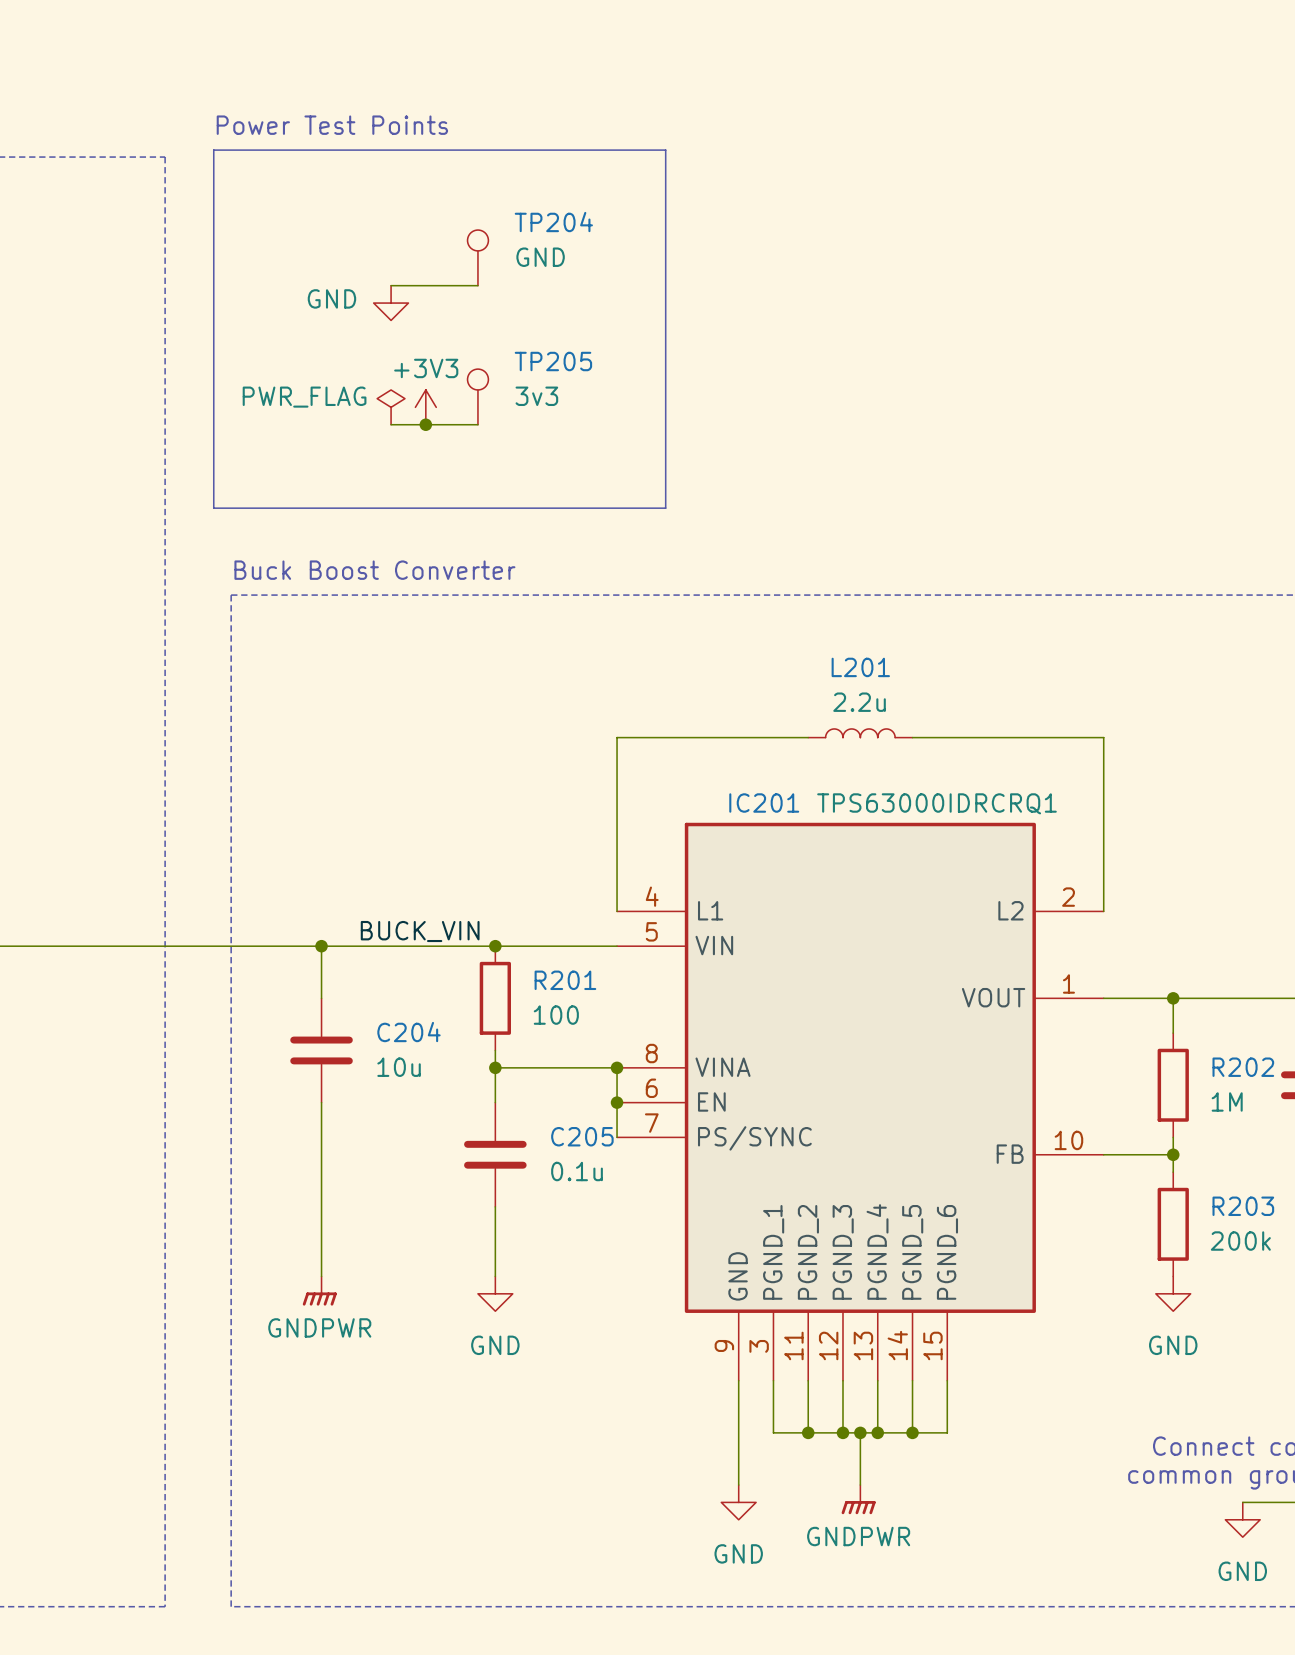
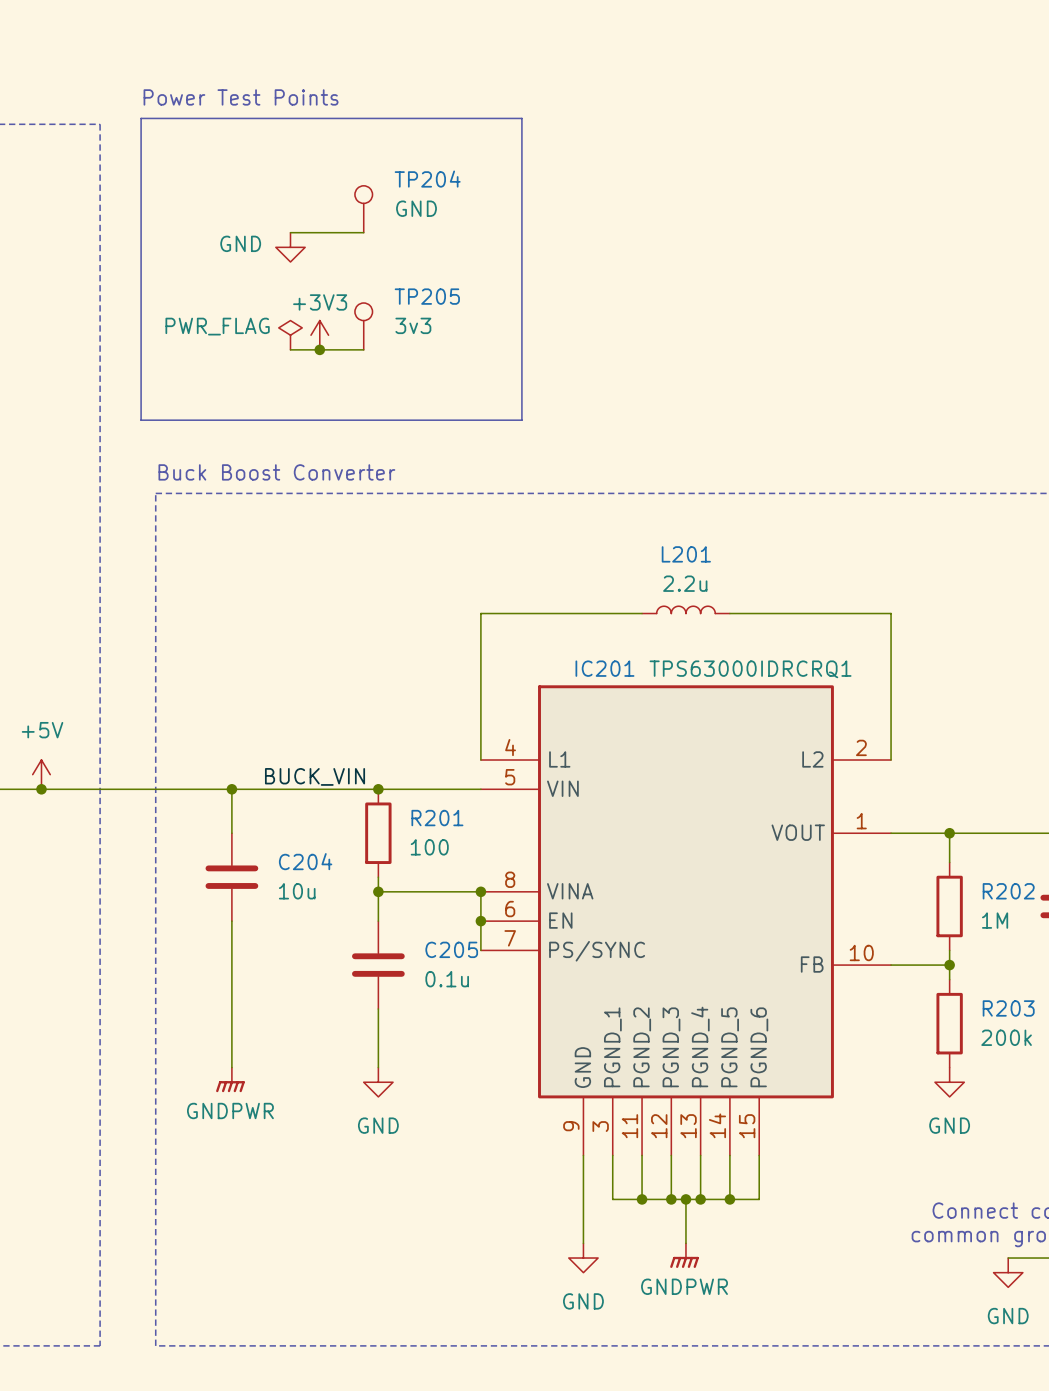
power symbol: none -> +5V (41, 774)
junction: none -> (41, 789)

